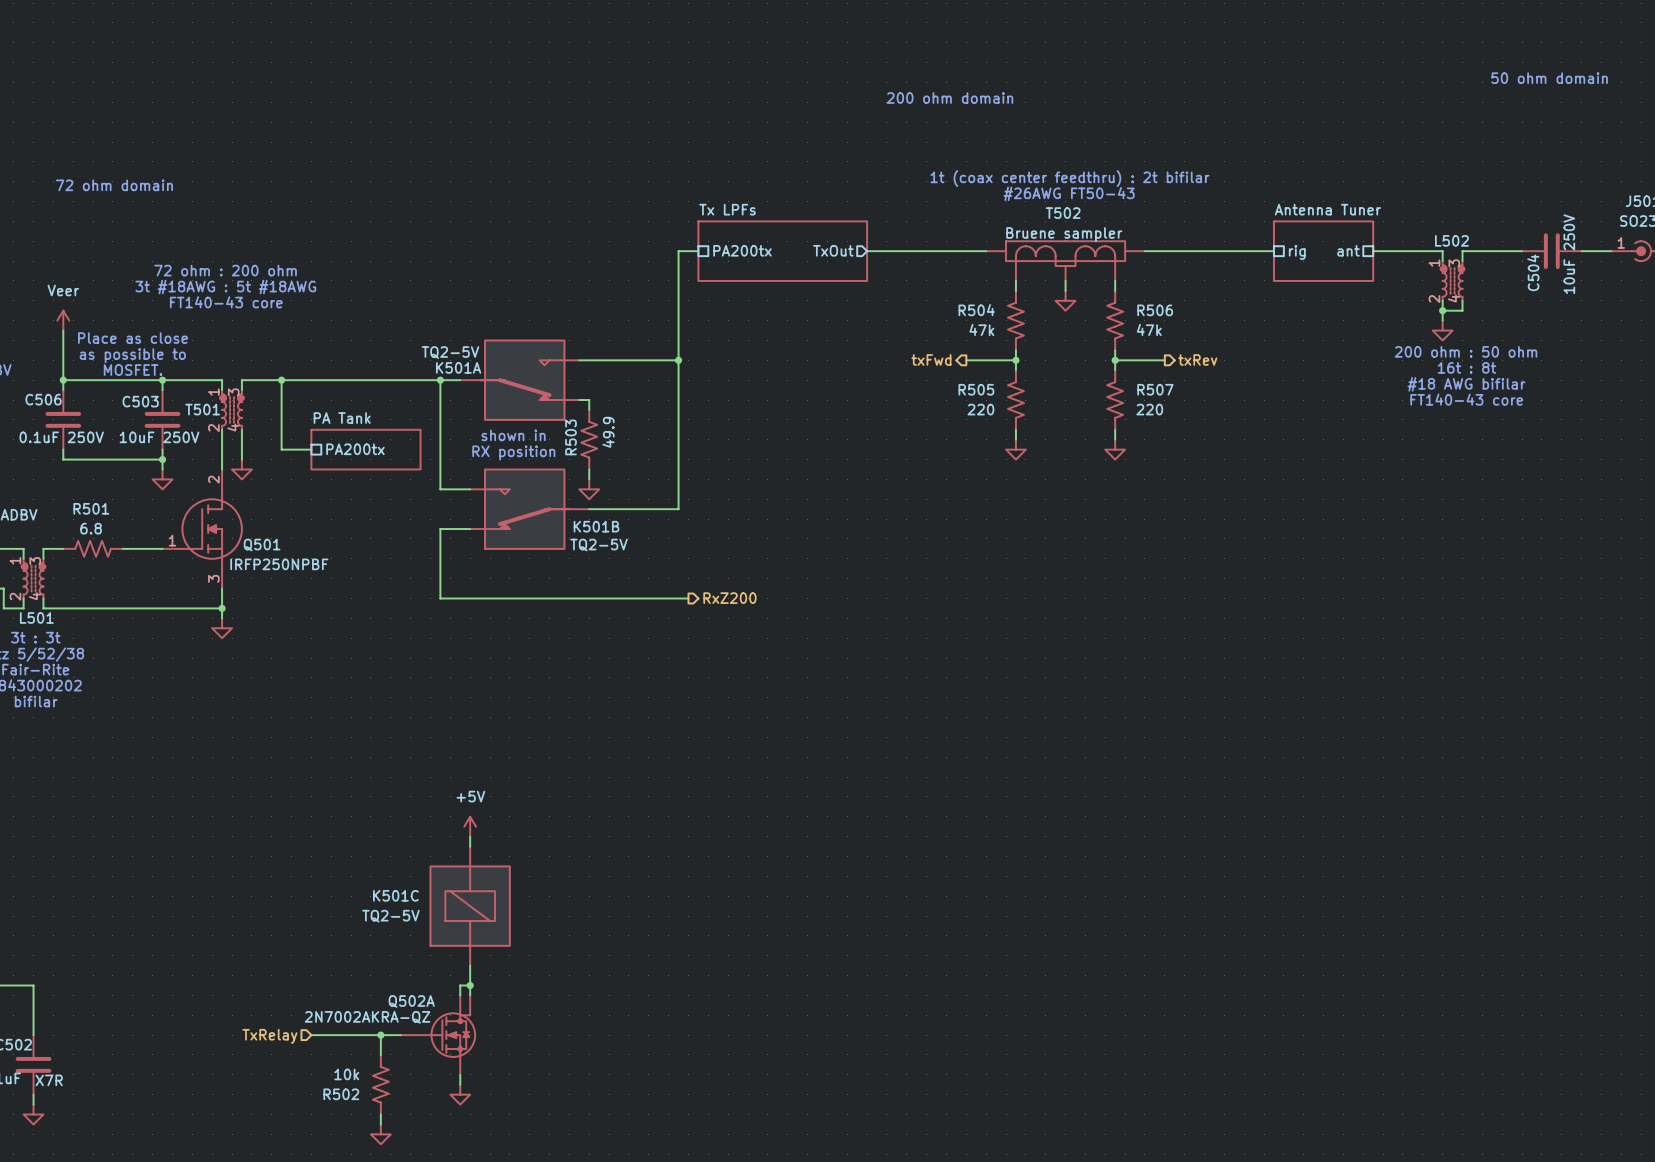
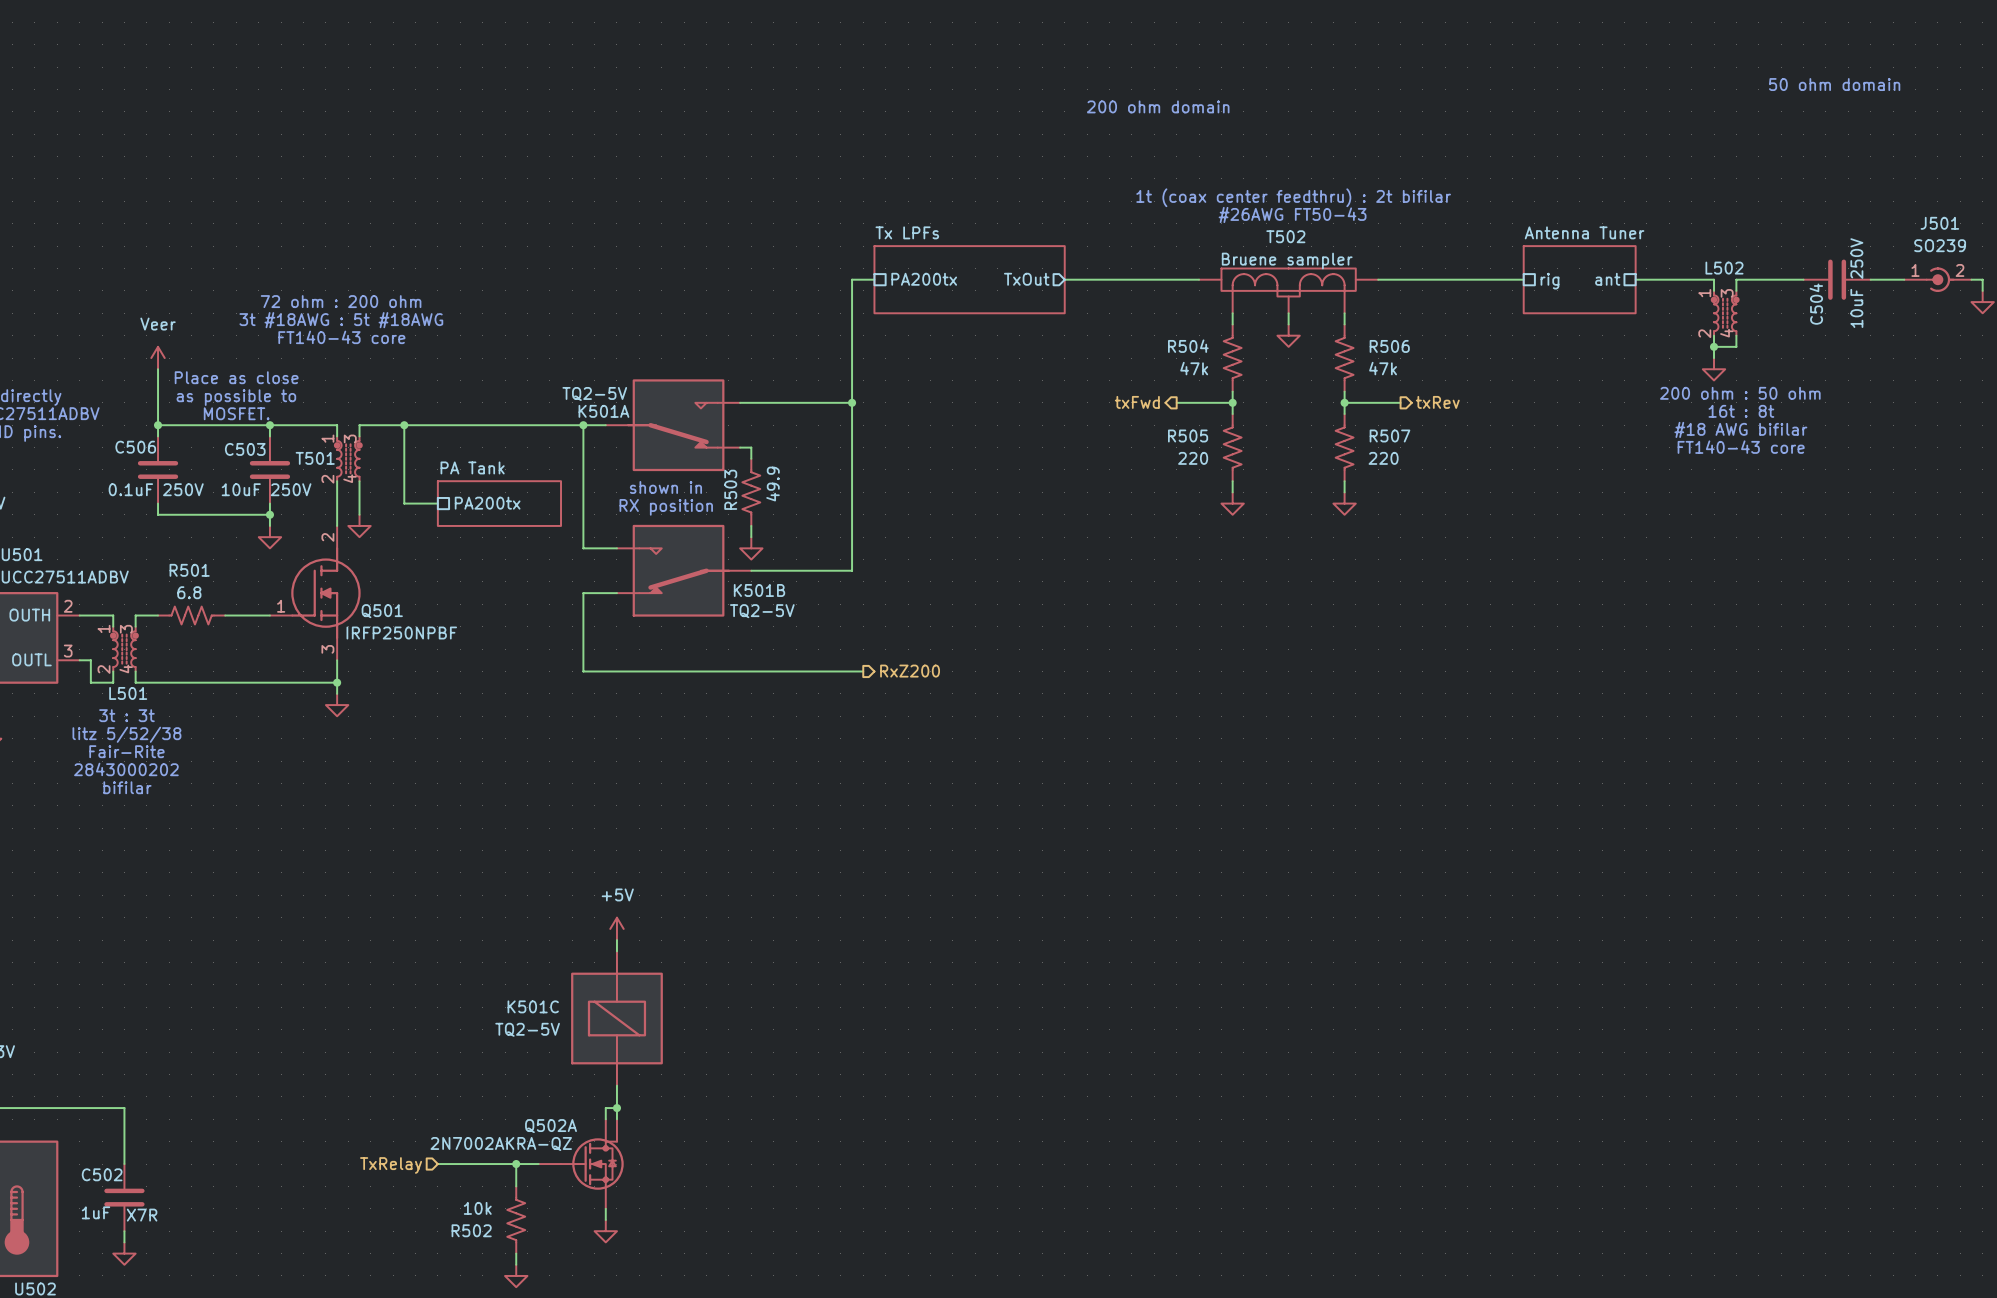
text: 72 ohm domain (114, 185) -> none

